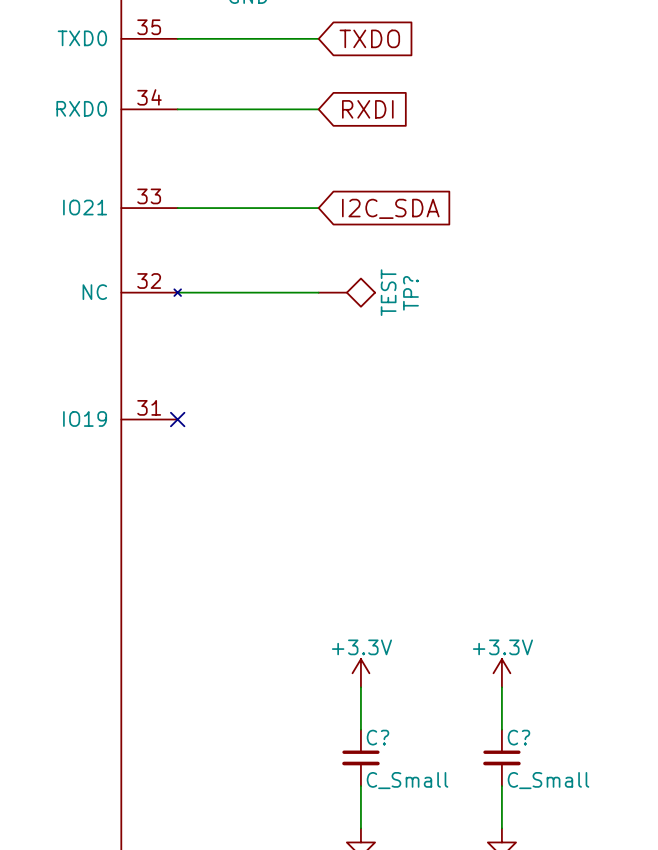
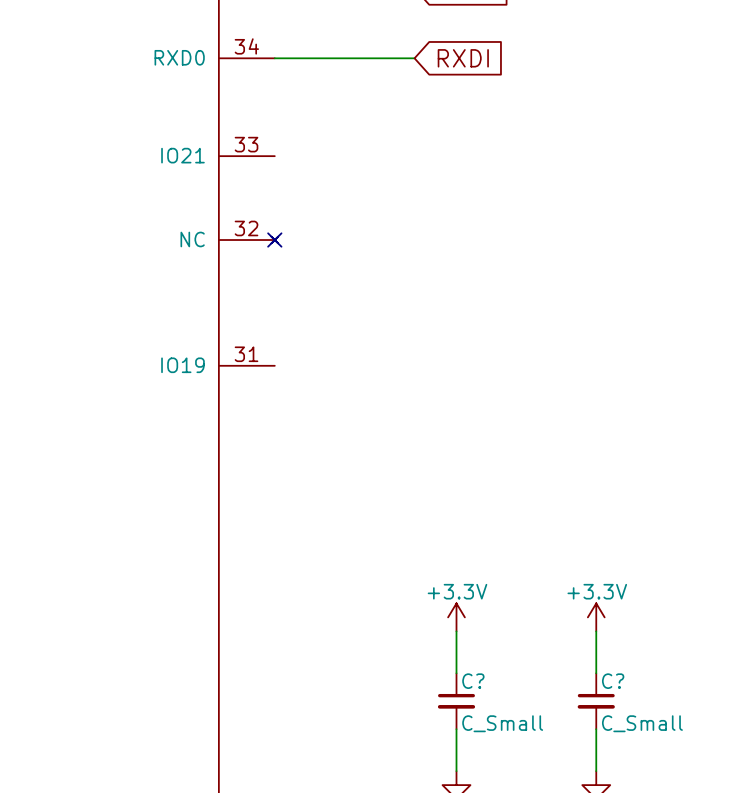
wire: (177, 208) (318, 208) -> none
global label: I2C_SDA (390, 208) -> none
wire: (177, 292) (318, 292) -> none
no-connect mark: none -> (274, 240)
TP?: TEST (346, 292) -> none
no-connect mark: (177, 419) -> none

